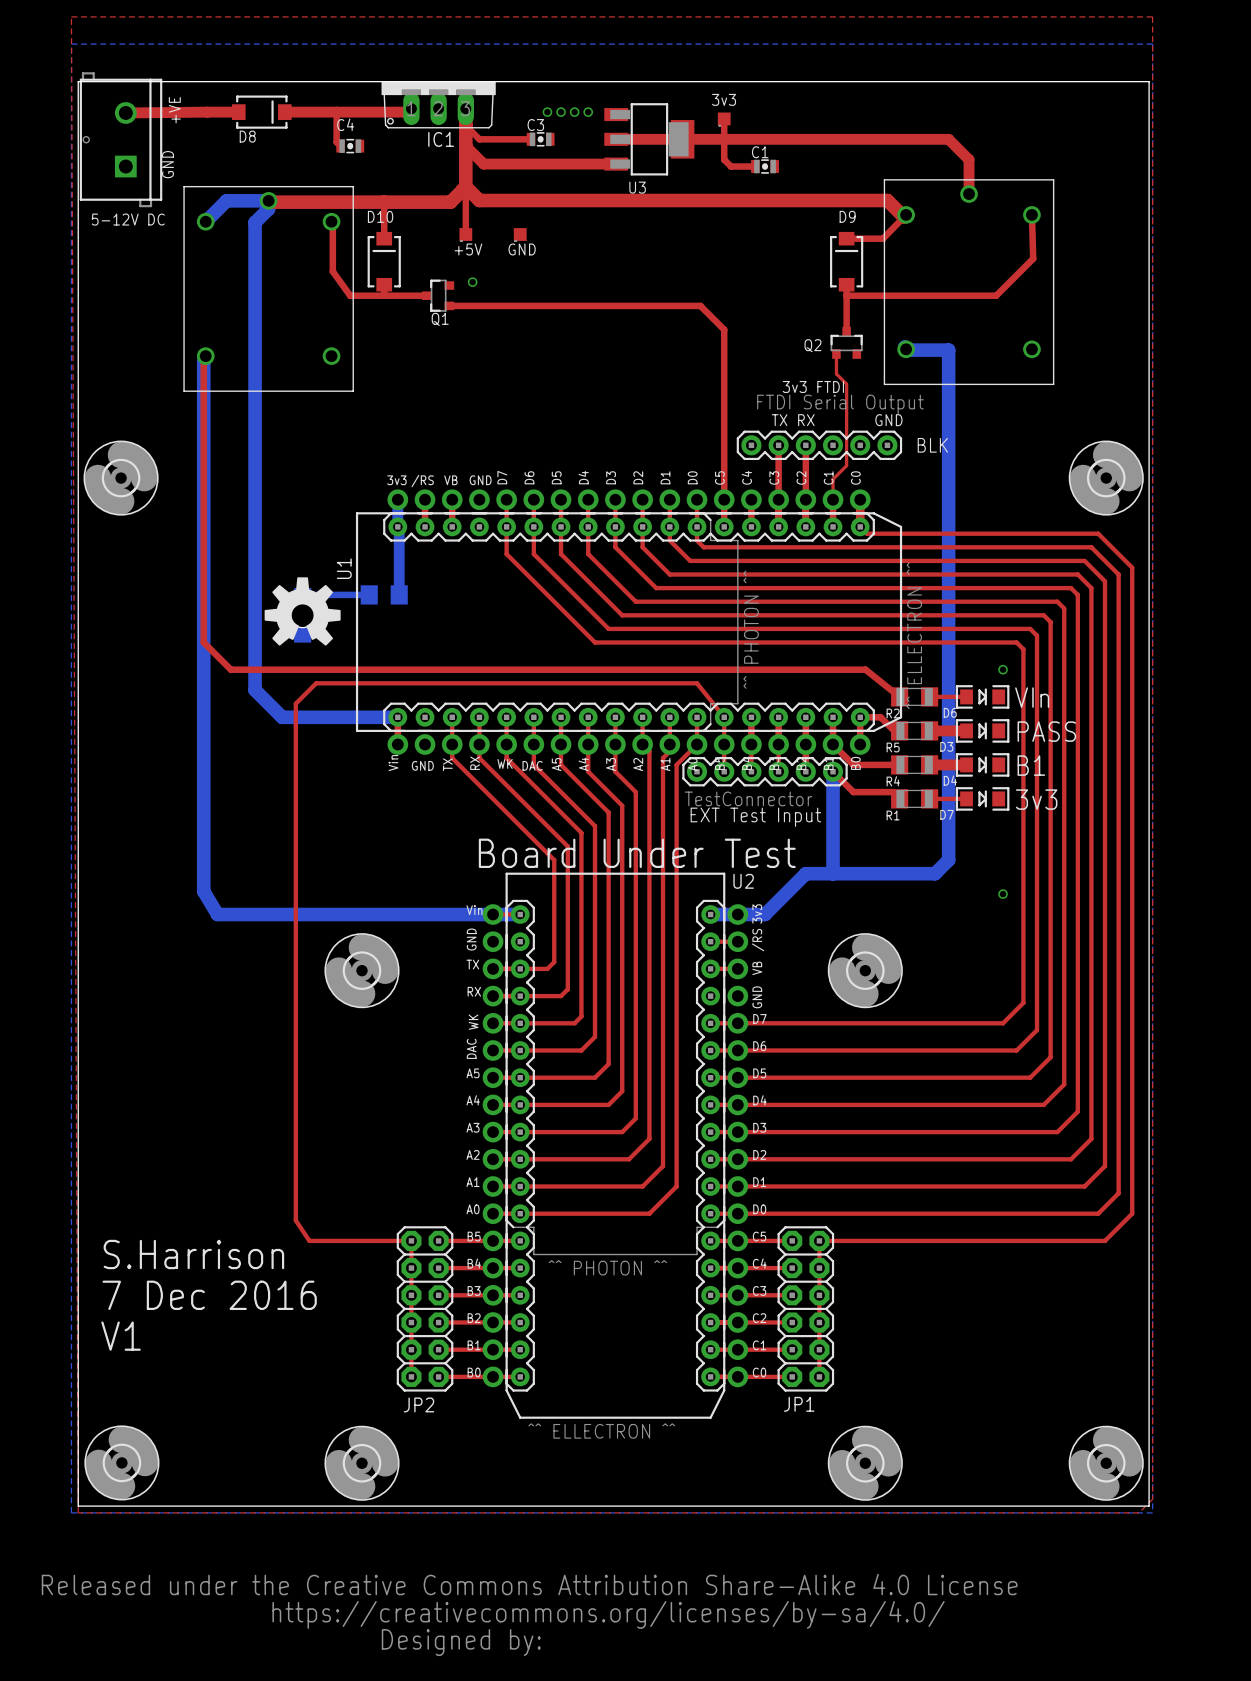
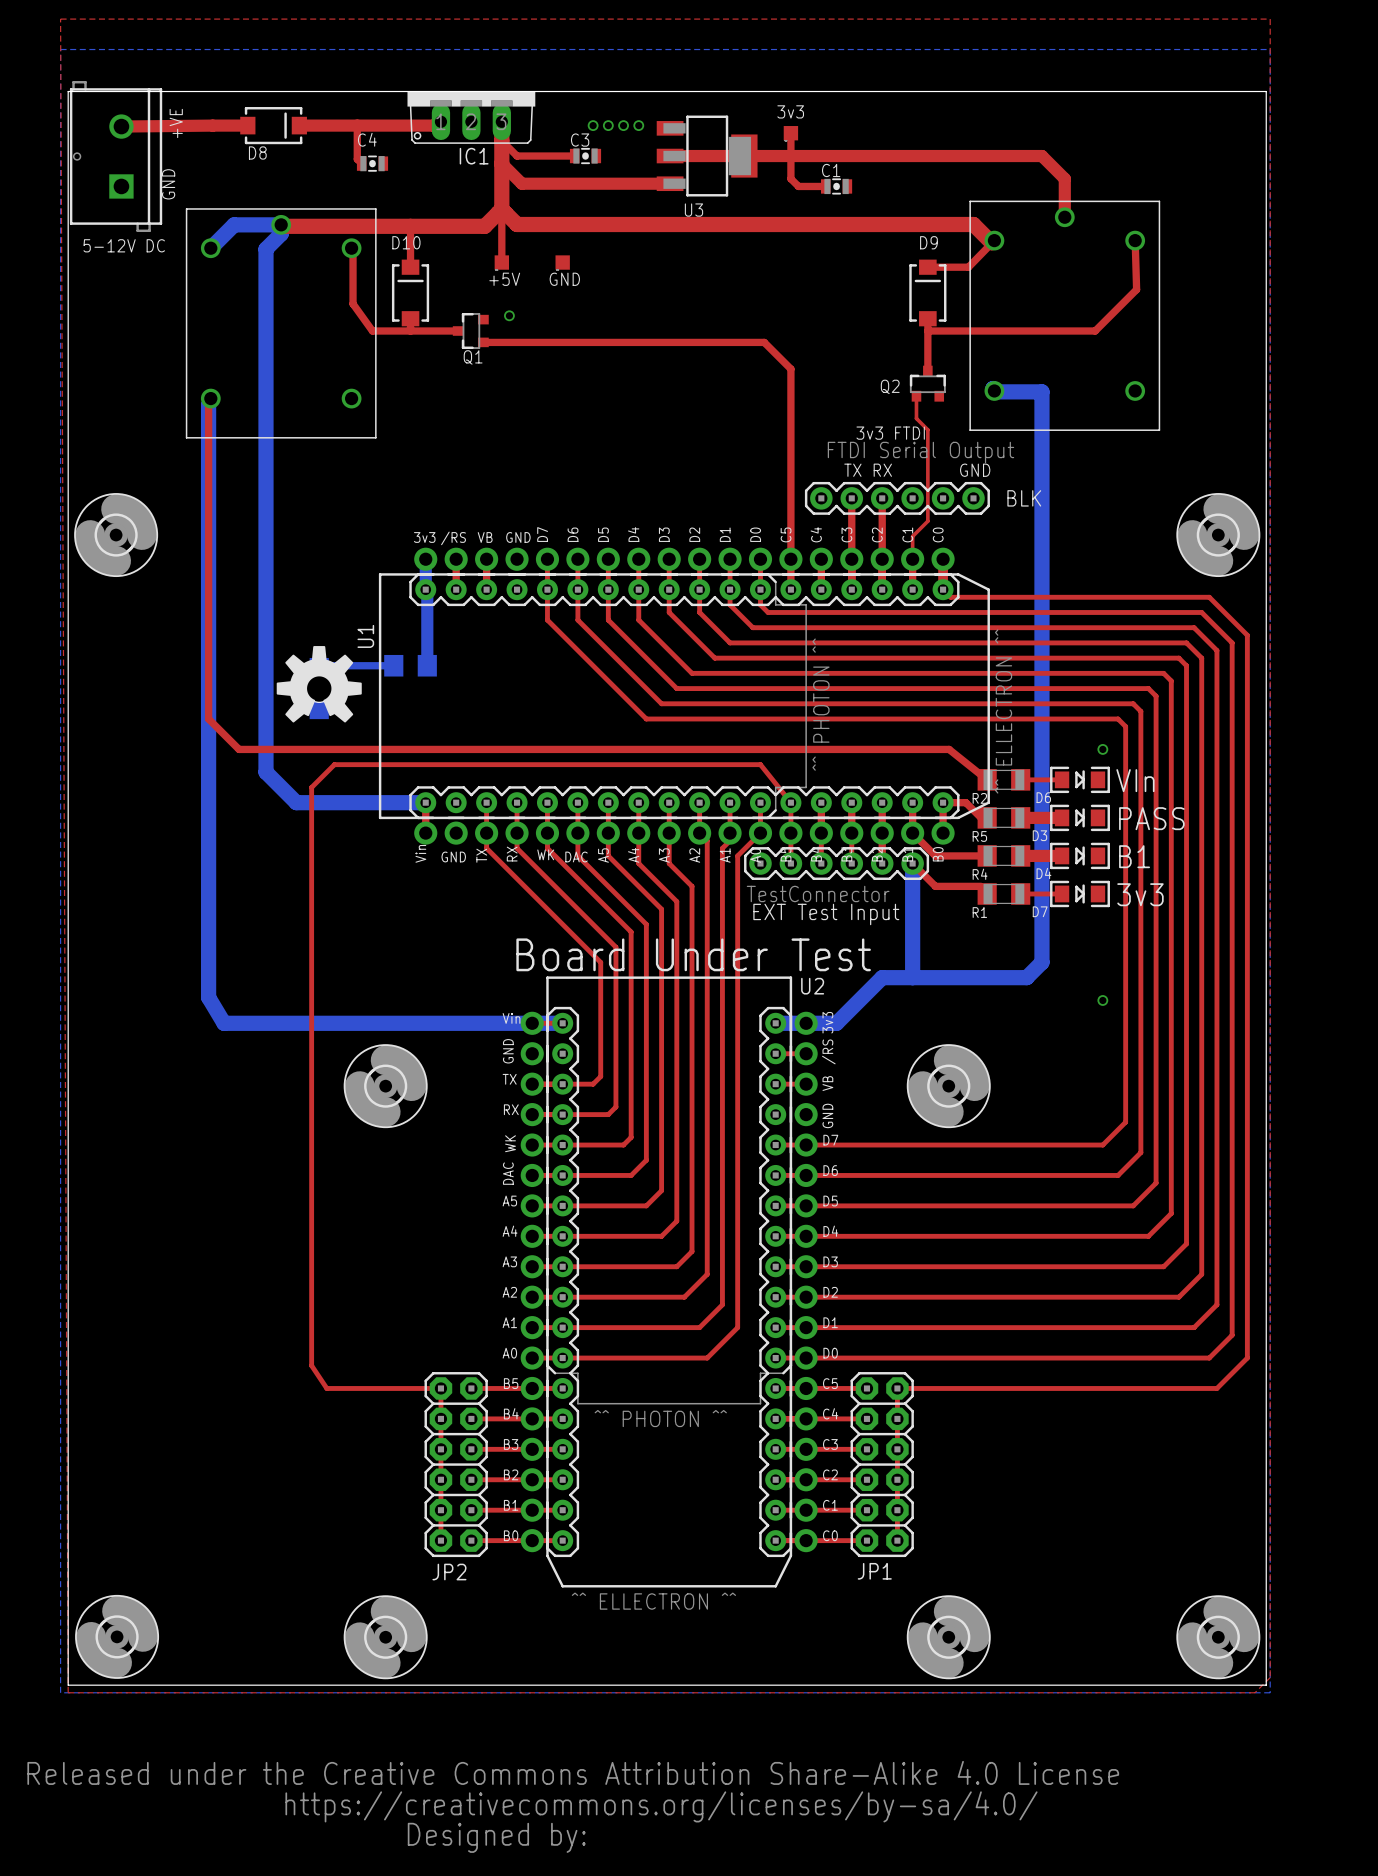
text: S.Harrison (193, 1254) -> none
text: 7 Dec 2016 (209, 1295) -> none
text: V1 (121, 1336) -> none

